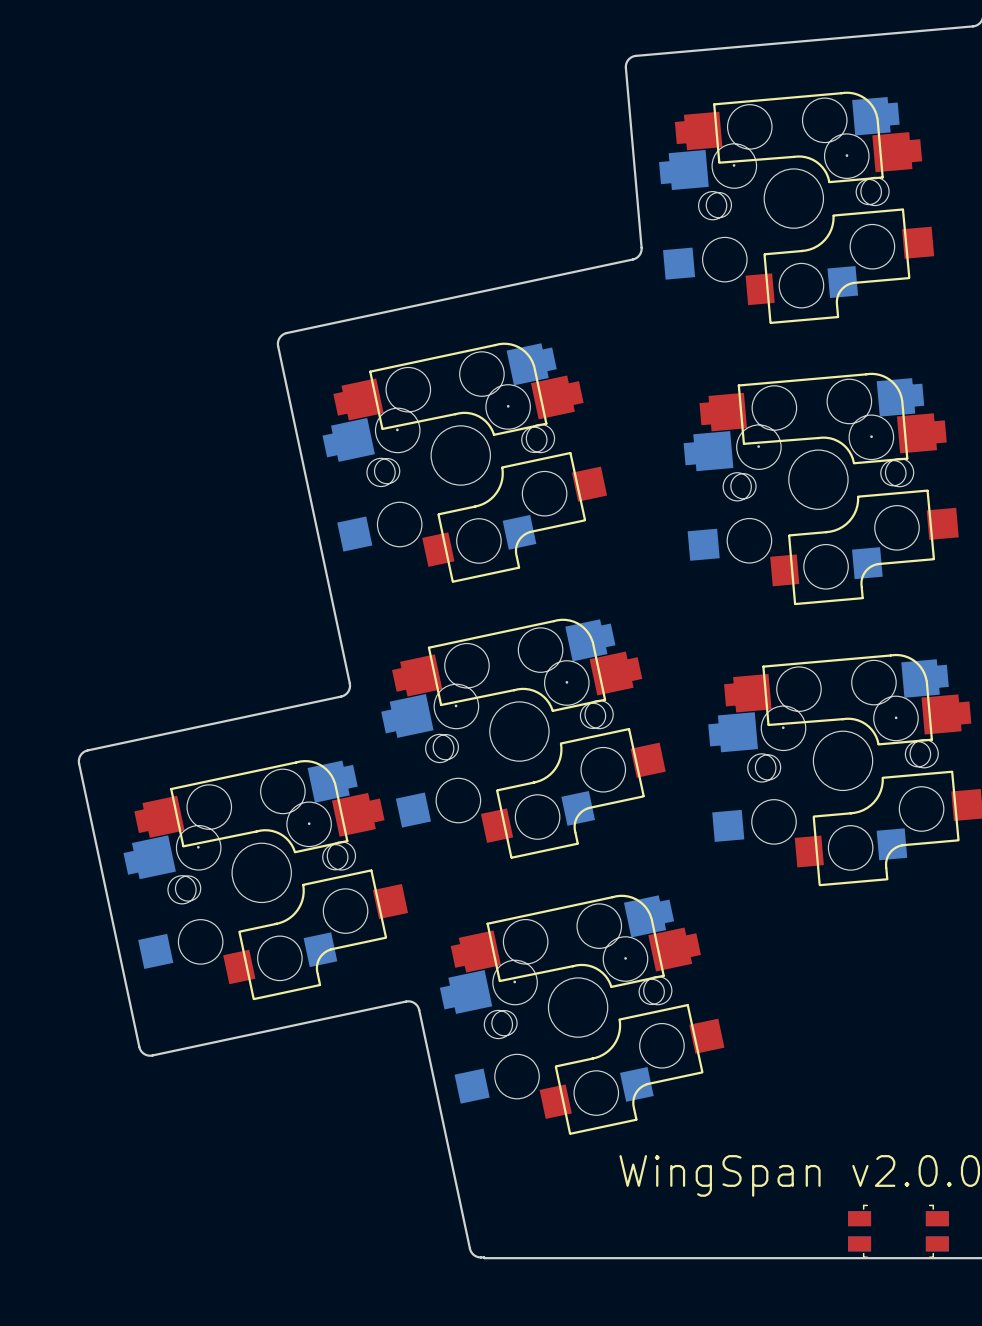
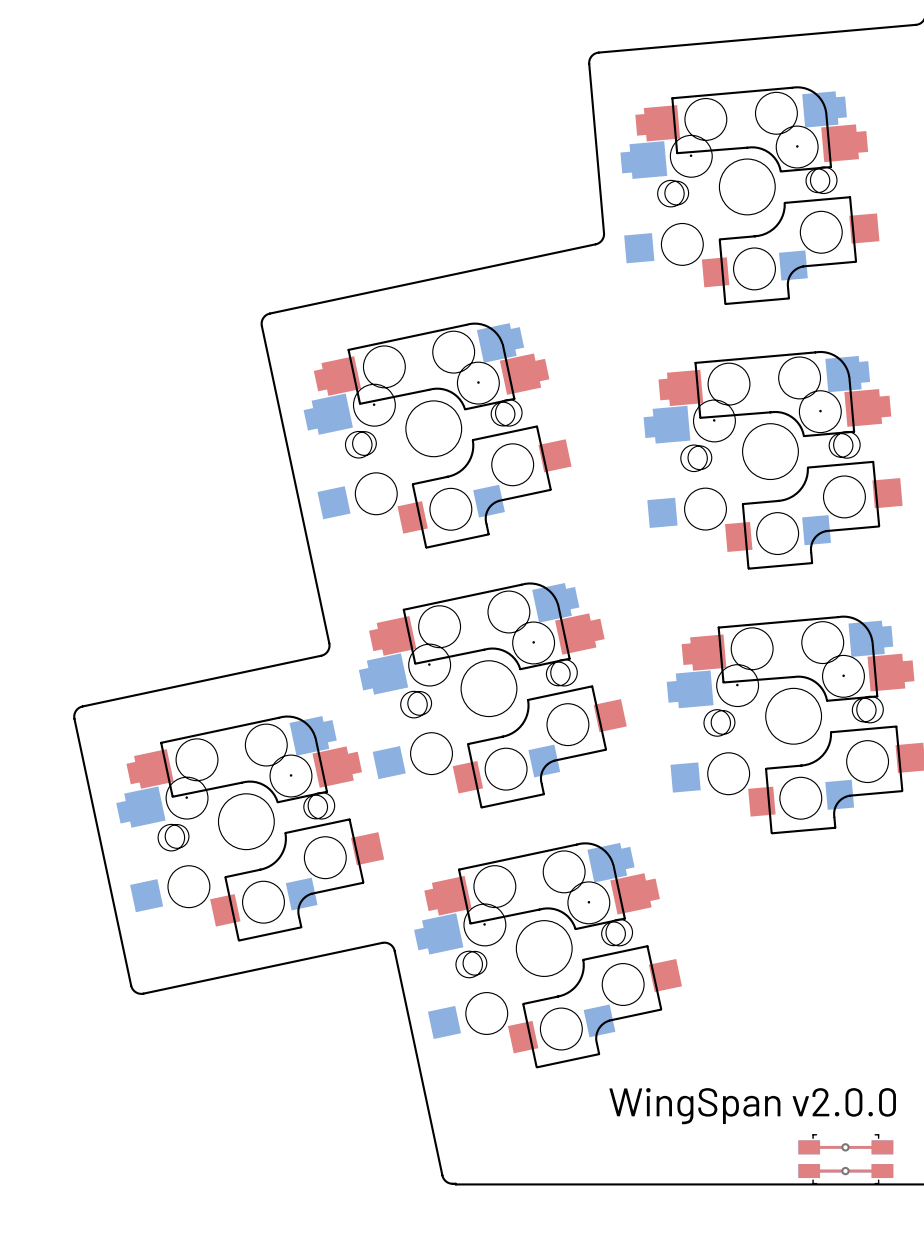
top track: none -> (809, 1147) (882, 1147)
via: none -> (845, 1147)
top track: none -> (809, 1171) (882, 1171)
via: none -> (845, 1171)

